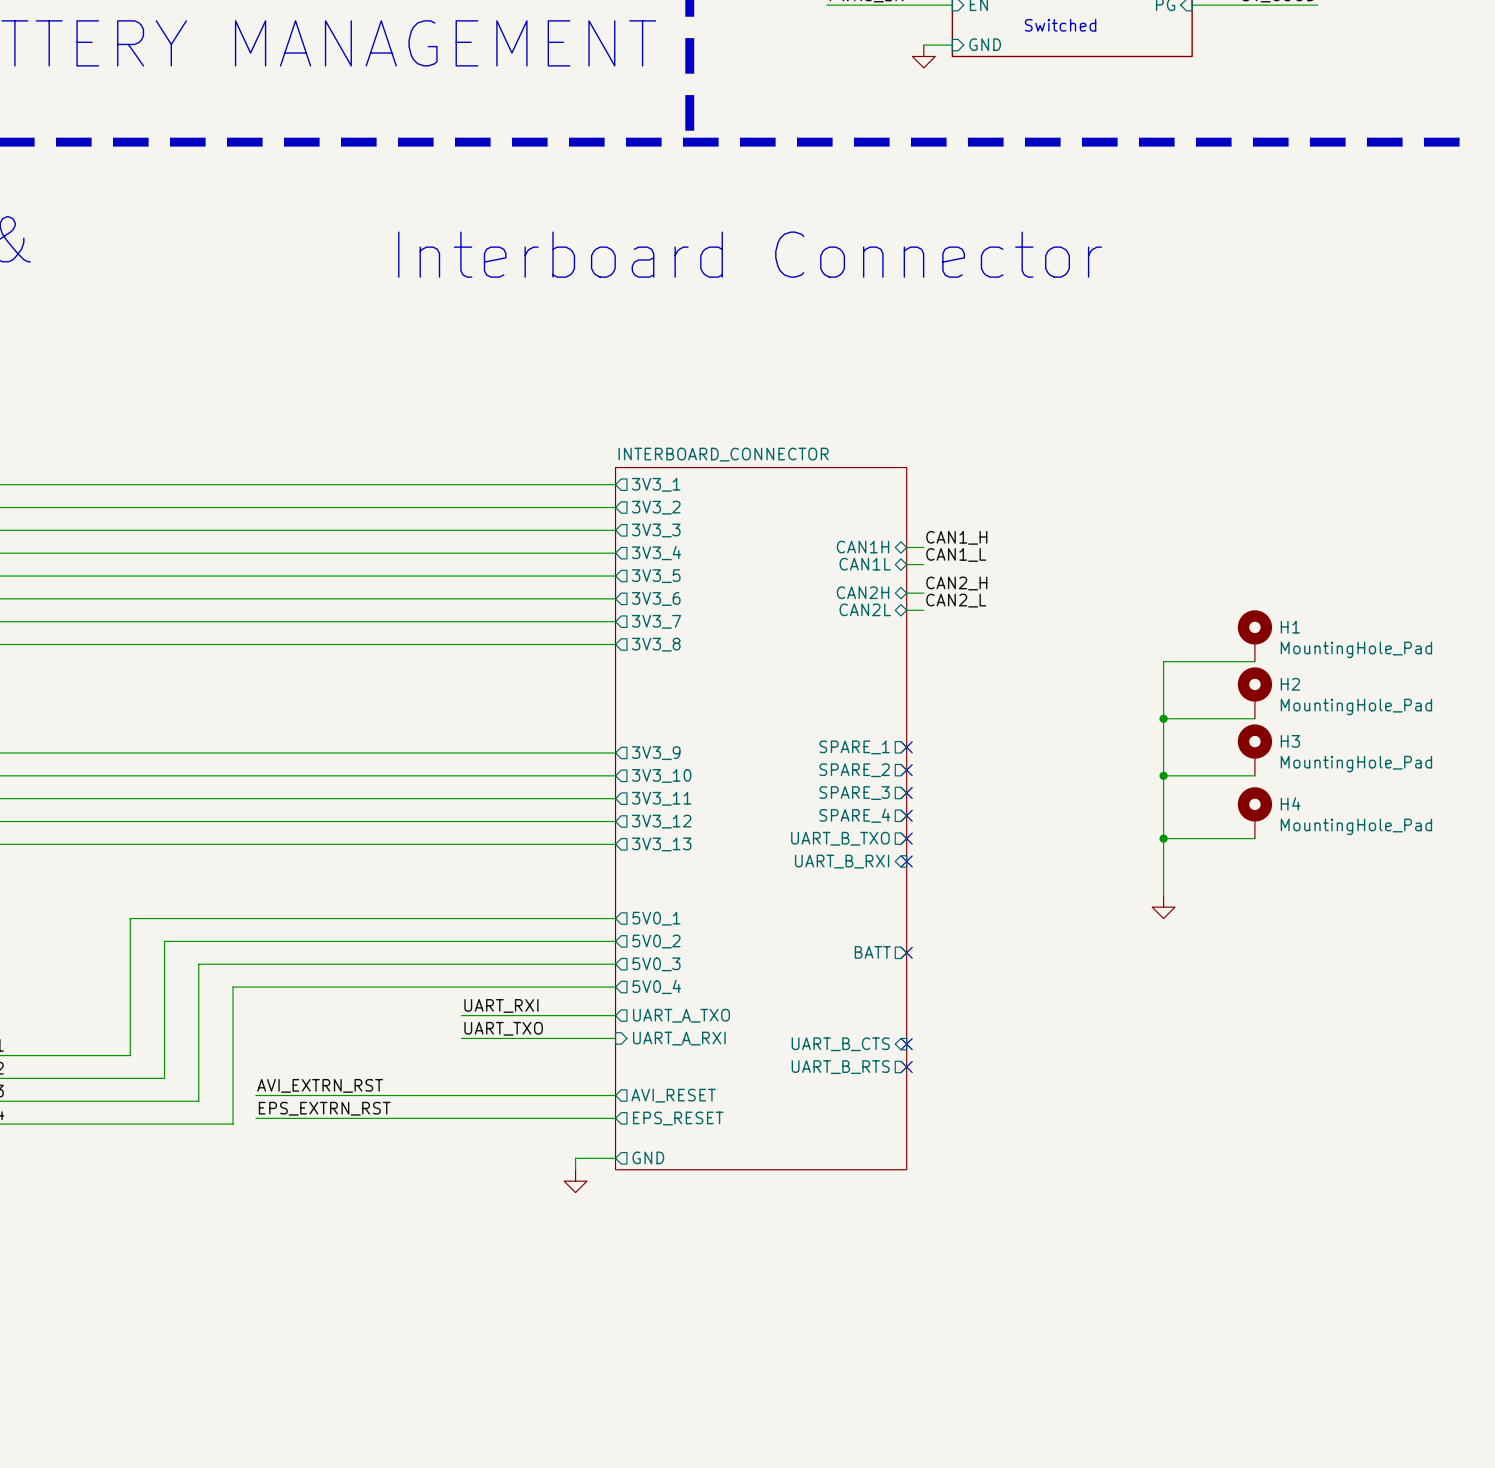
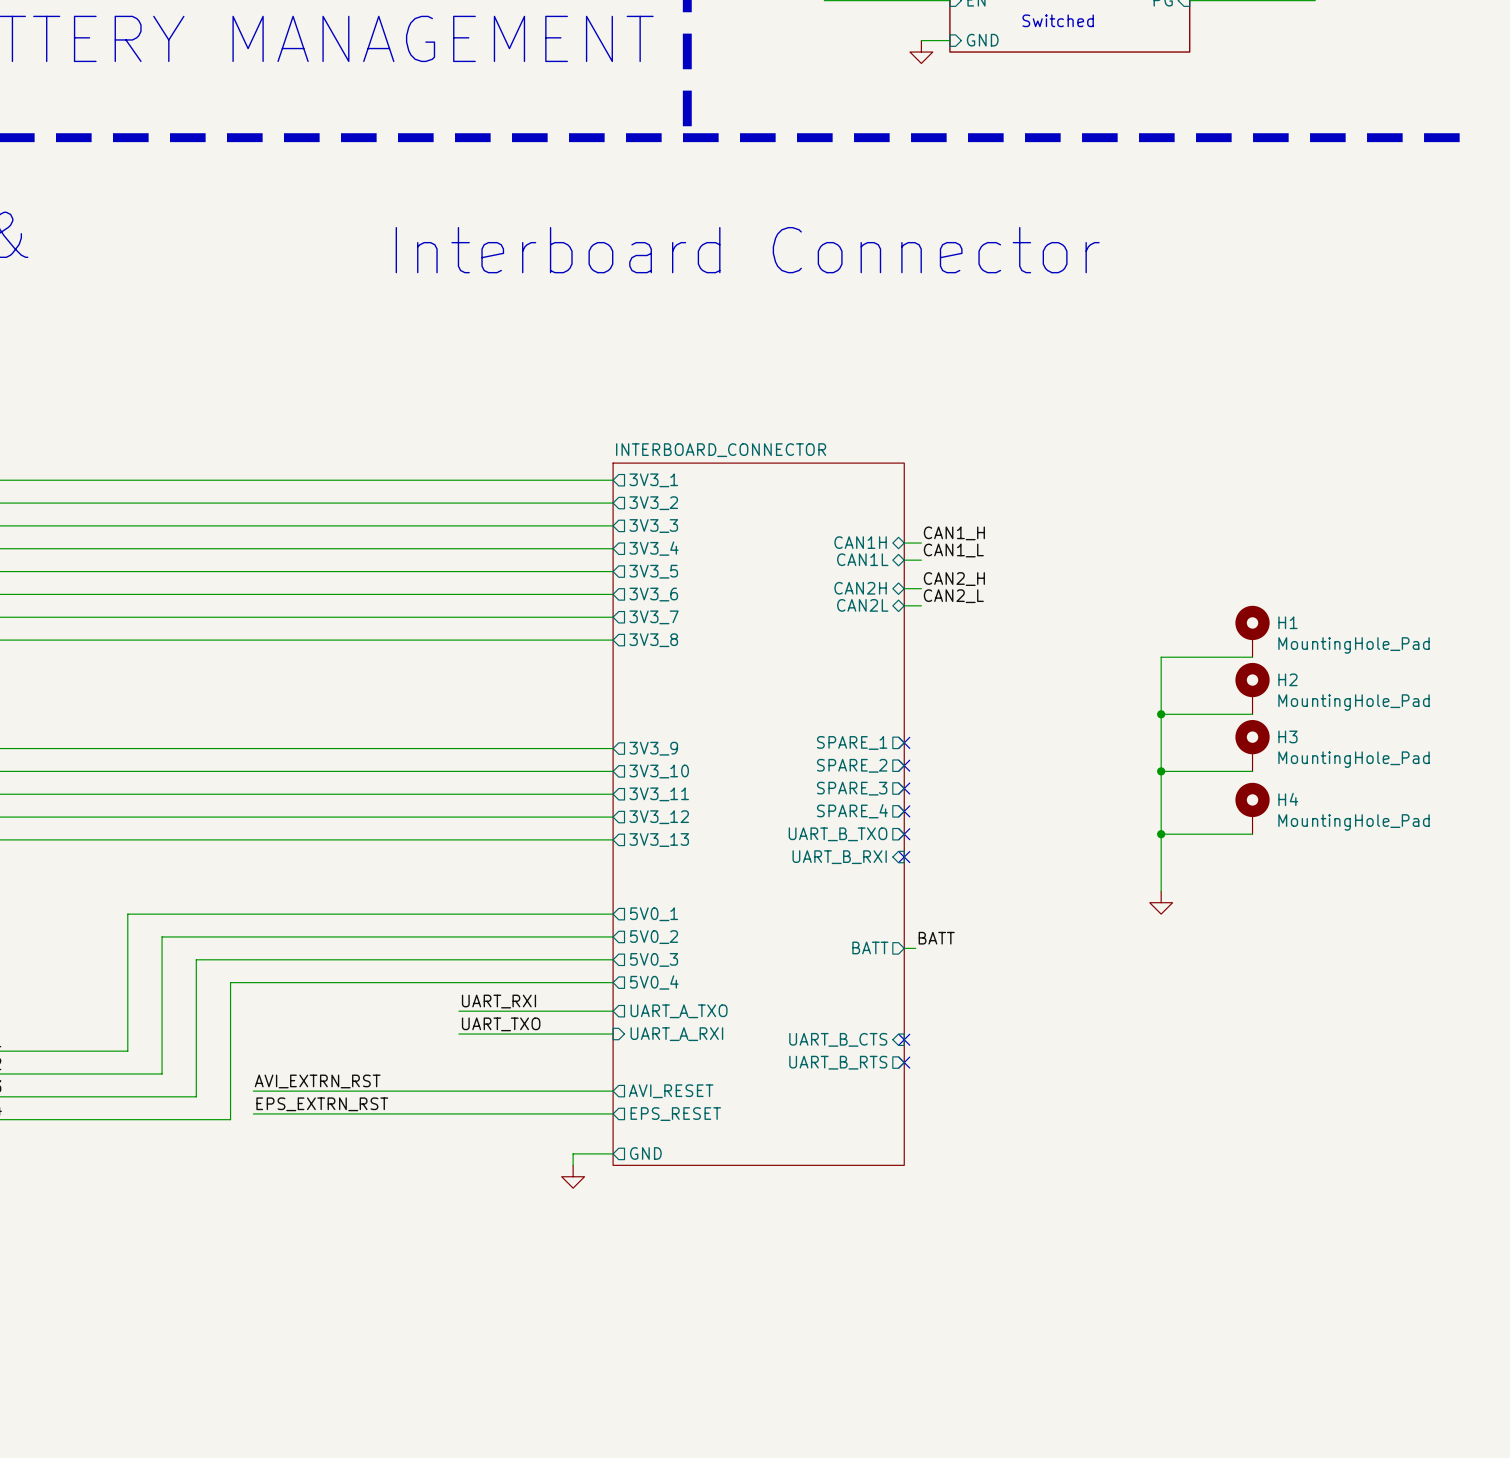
label: none -> BATT (936, 938)
wire: none -> (904, 948) (915, 948)
no-connect mark: (906, 952) -> none

